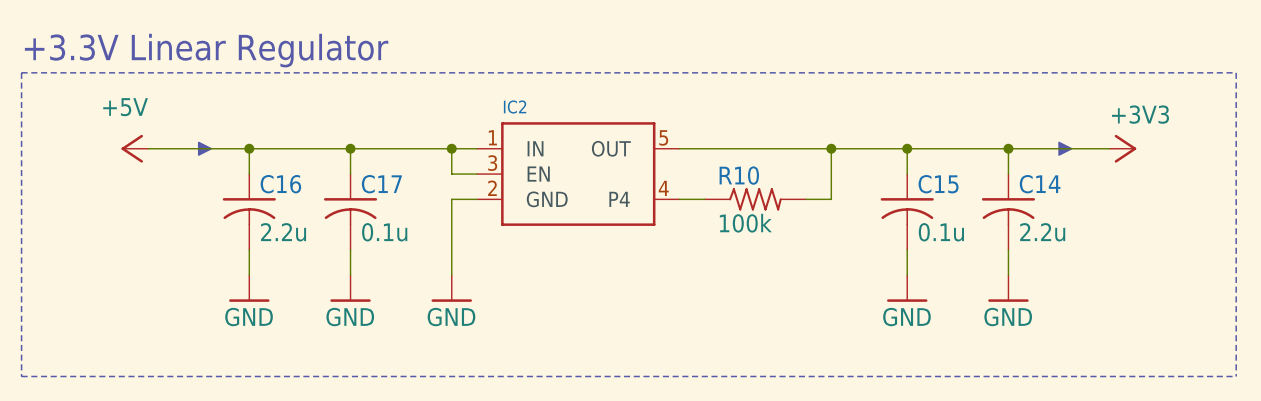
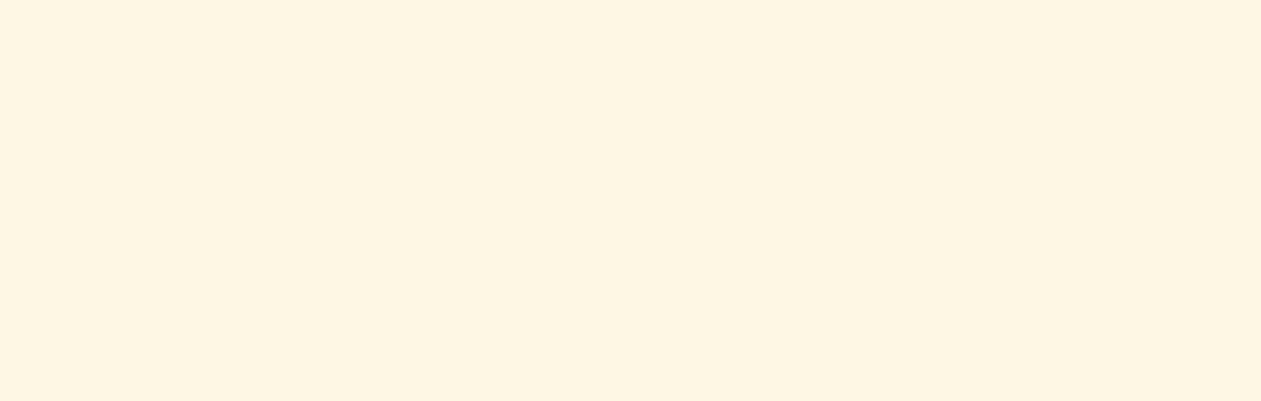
text: +3.3V Linear Regulator (206, 50) -> none
line: (21, 72) (1236, 72) (1236, 376) (21, 376) (21, 72) -> none
power symbol: +5V (134, 148) -> none
wire: (148, 148) (477, 148) -> none
part: (205, 148) -> none
wire: (249, 148) (249, 174) -> none
junction: (249, 148) -> none
wire: (350, 148) (350, 174) -> none
junction: (350, 148) -> none
wire: (451, 148) (451, 174) (477, 174) -> none
junction: (451, 148) -> none
wire: (679, 148) (1109, 148) -> none
wire: (831, 148) (831, 199) (806, 199) -> none
junction: (831, 148) -> none
wire: (907, 148) (907, 174) -> none
junction: (907, 148) -> none
wire: (1008, 148) (1008, 174) -> none
junction: (1008, 148) -> none
part: (1065, 148) -> none
power symbol: +3V3 (1122, 148) -> none
IC2: (578, 174) -> none
wire: (477, 199) (451, 199) (451, 275) -> none
wire: (679, 199) (704, 199) -> none
R10: 100k (755, 199) -> none
C16: 2.2u (249, 212) -> none
C17: 0.1u (350, 212) -> none
C15: 0.1u (907, 212) -> none
C14: 2.2u (1008, 212) -> none
wire: (249, 249) (249, 275) -> none
wire: (350, 249) (350, 275) -> none
wire: (907, 249) (907, 275) -> none
wire: (1008, 249) (1008, 275) -> none
power symbol: GND (249, 288) -> none
power symbol: GND (350, 288) -> none
power symbol: GND (451, 288) -> none
power symbol: GND (907, 288) -> none
power symbol: GND (1008, 288) -> none

